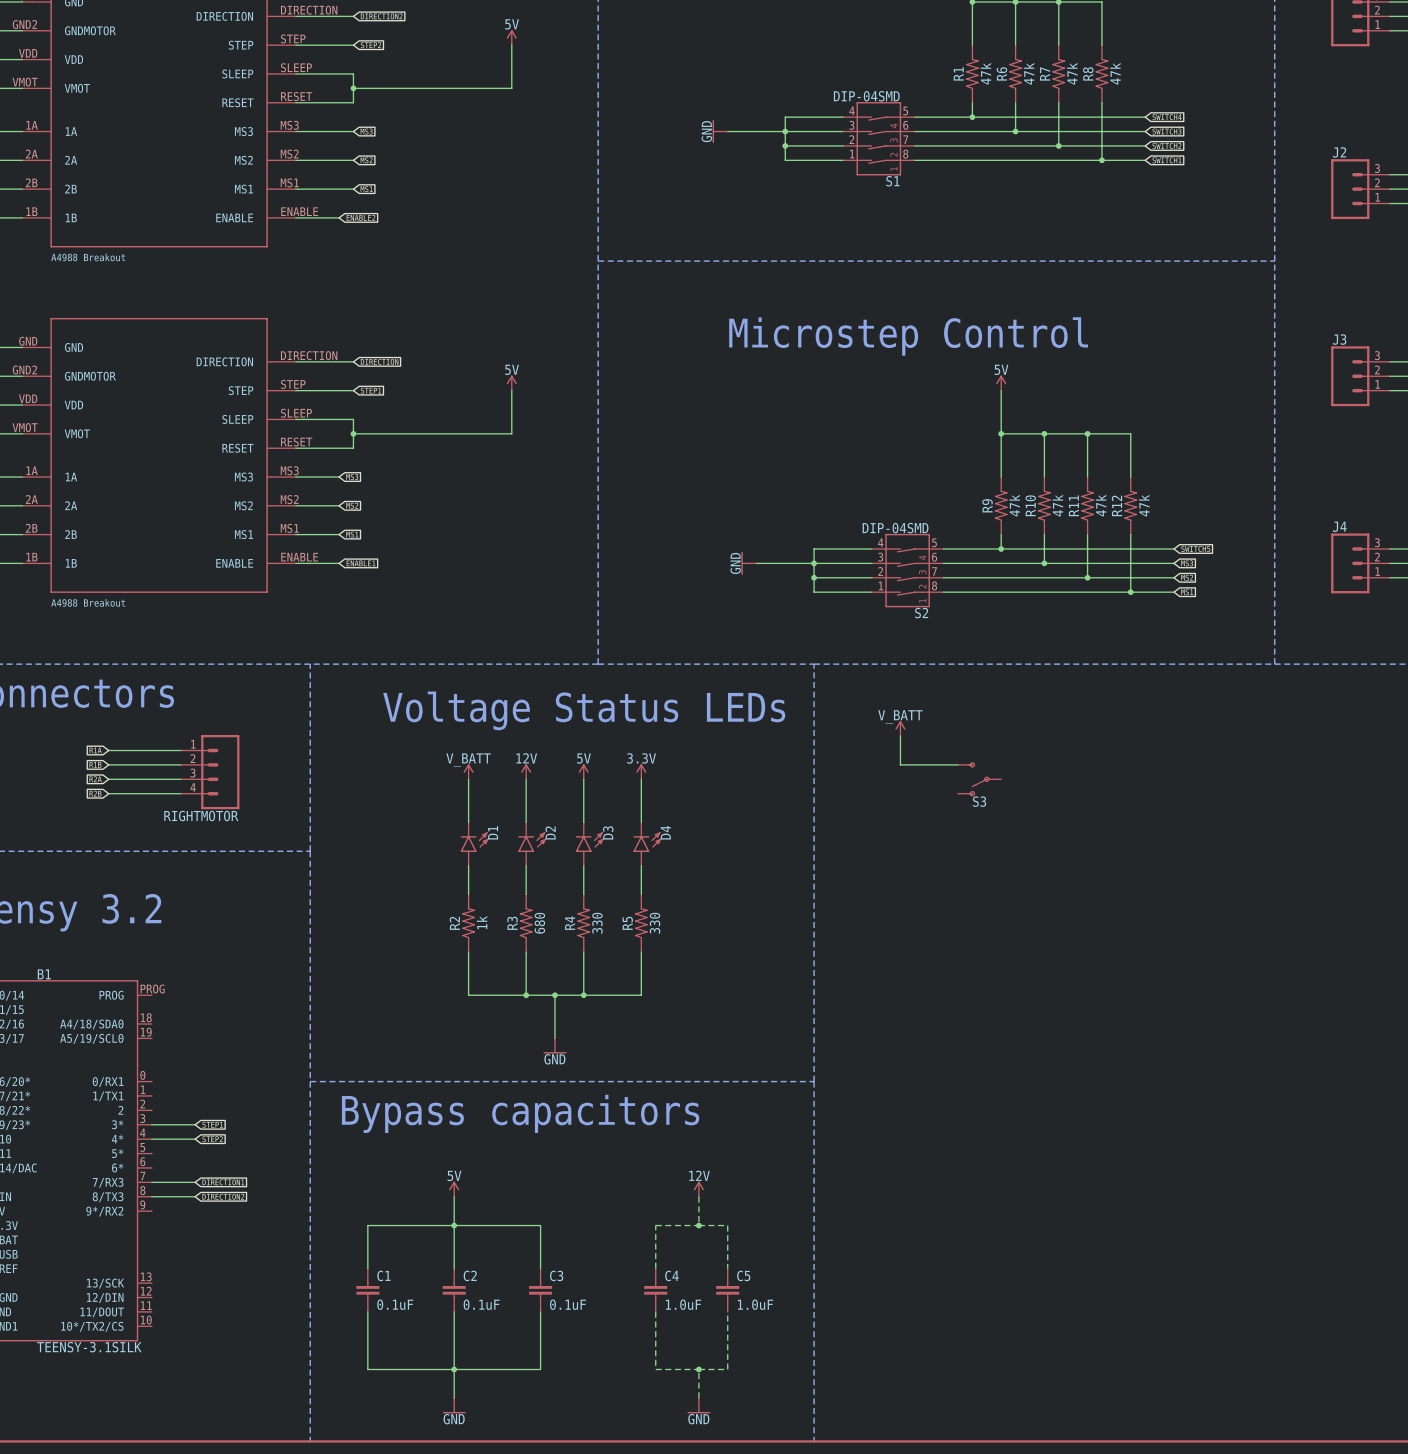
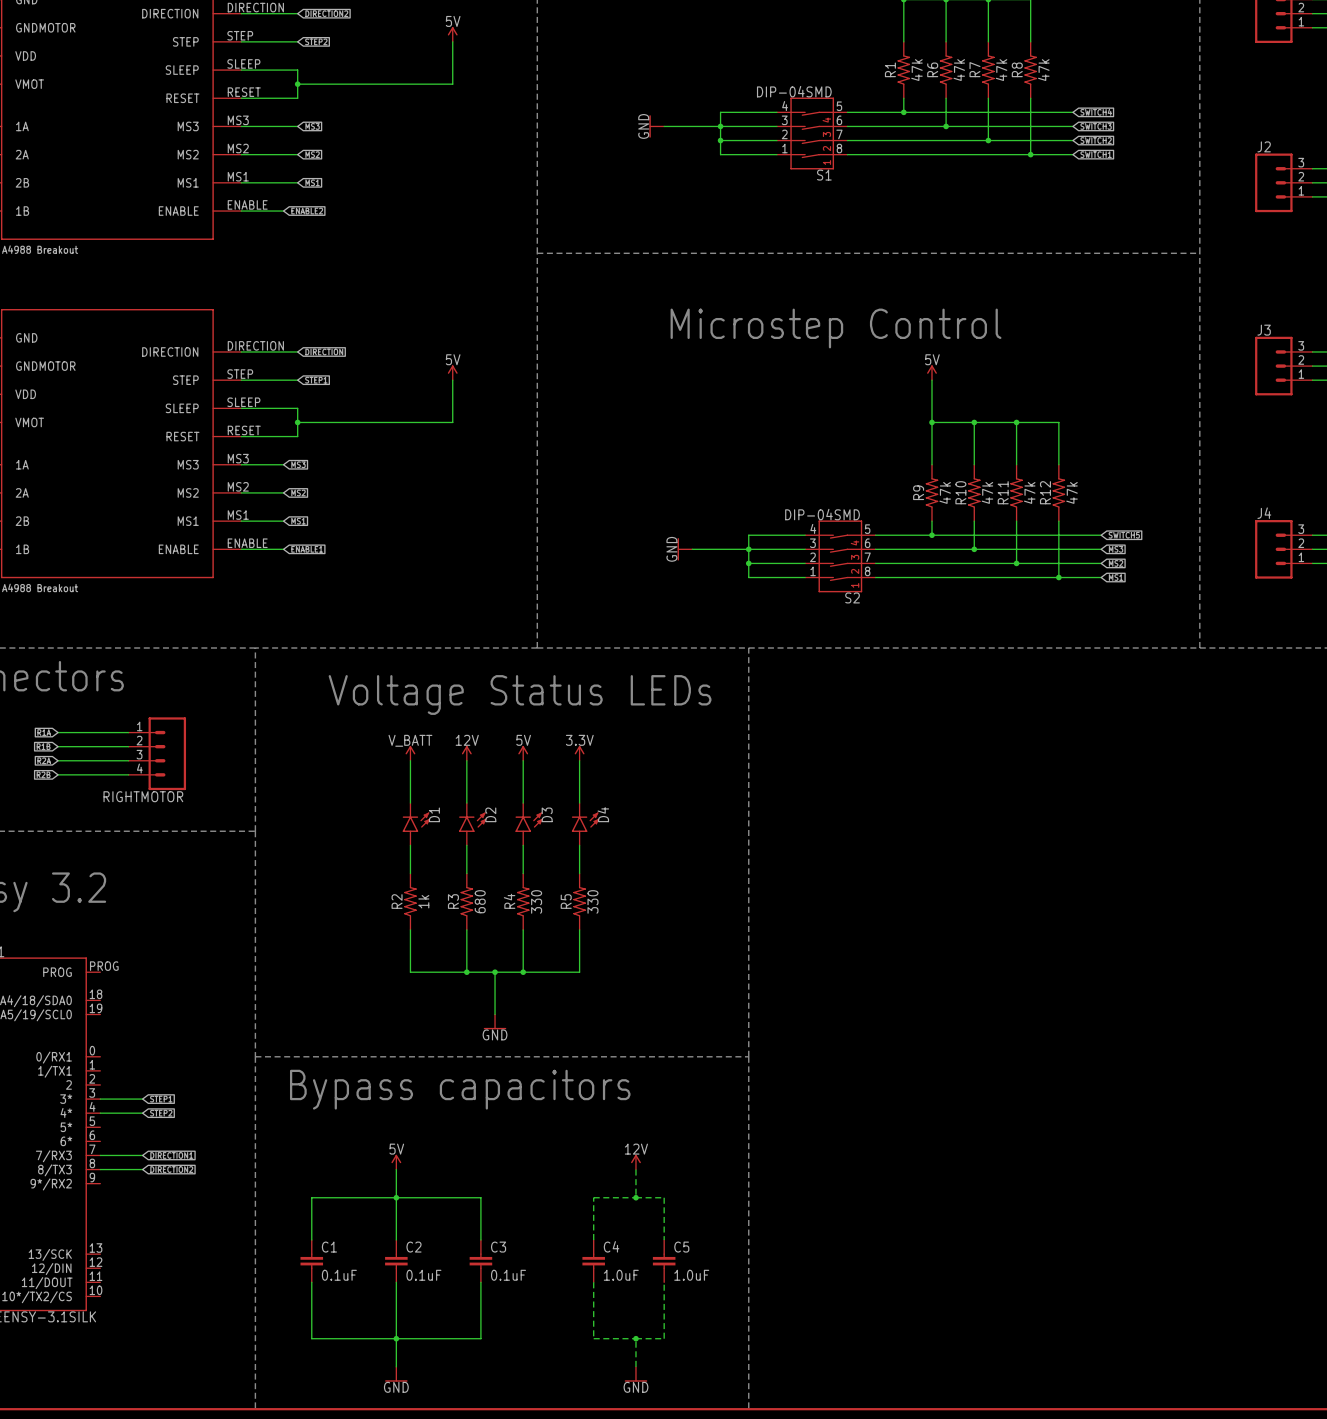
power symbol: V_BATT (900, 728) -> none
wire: (900, 736) (900, 764) (958, 764) -> none
S3: (979, 779) -> none

